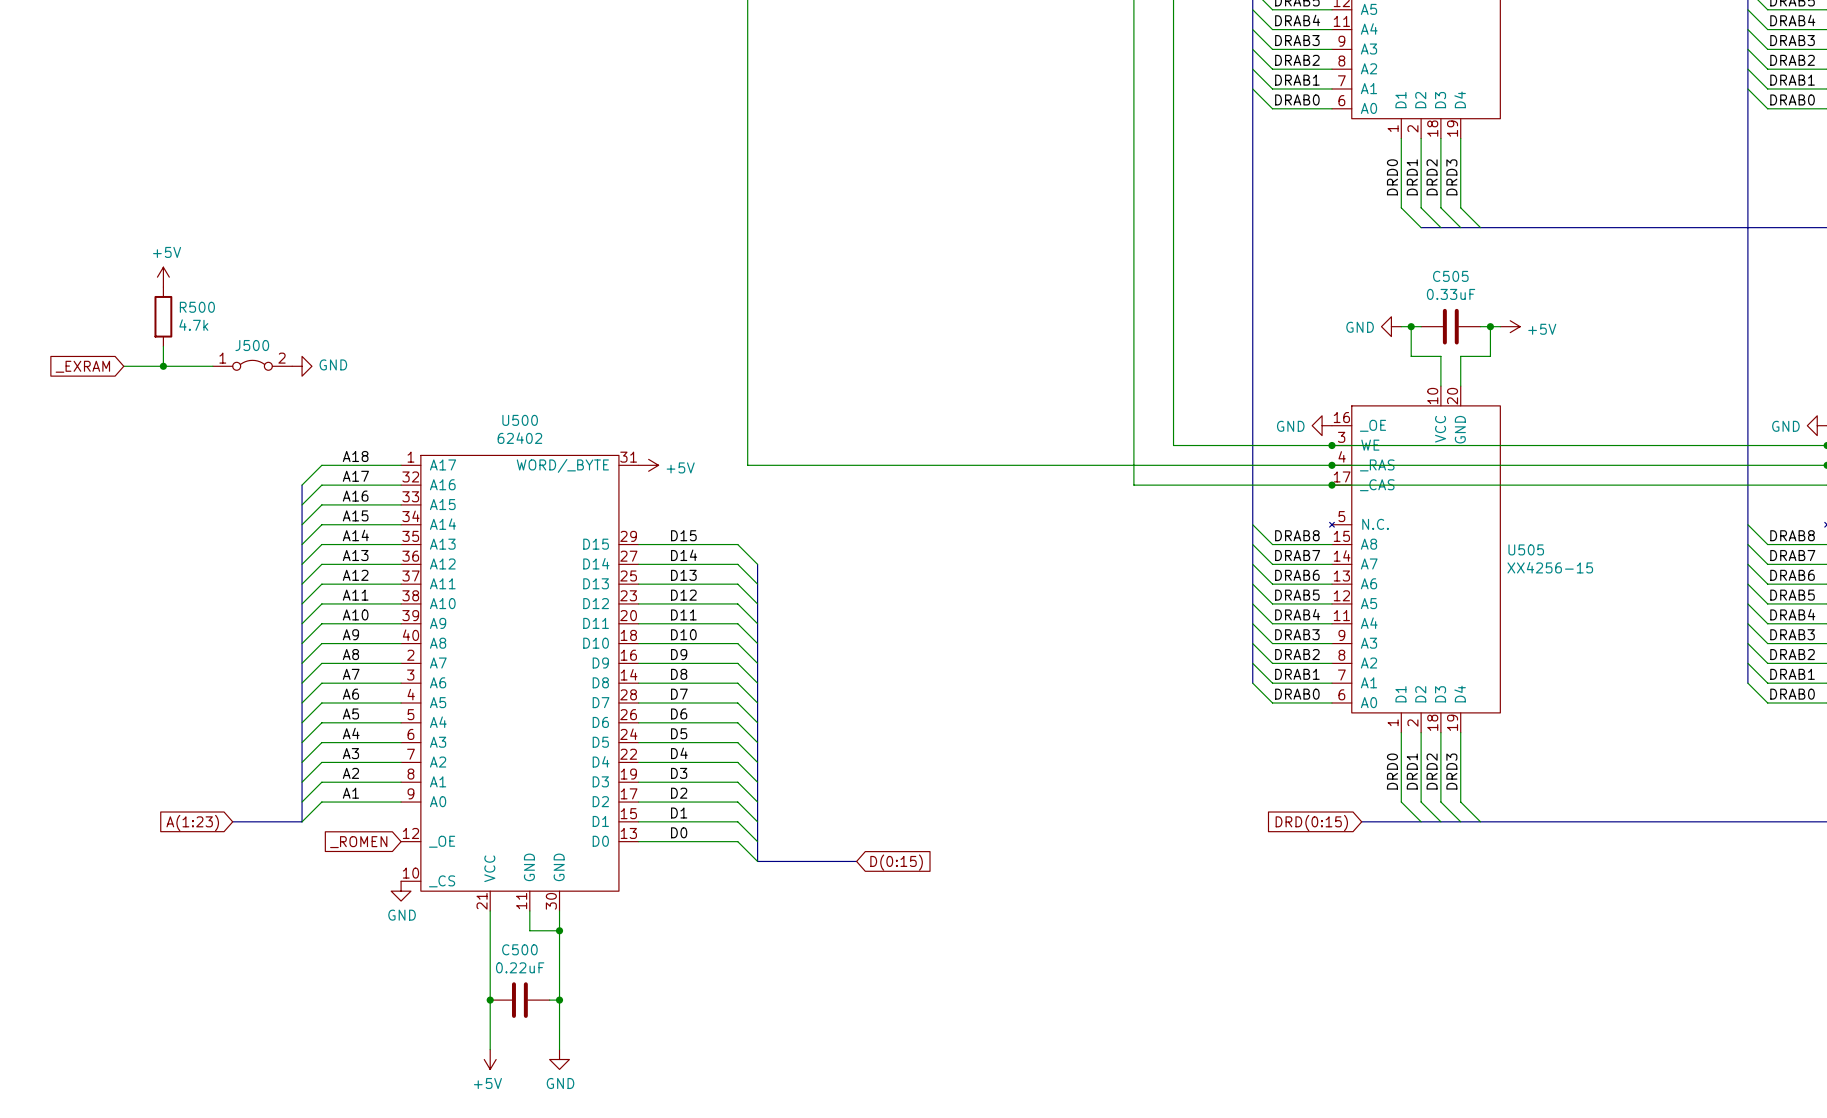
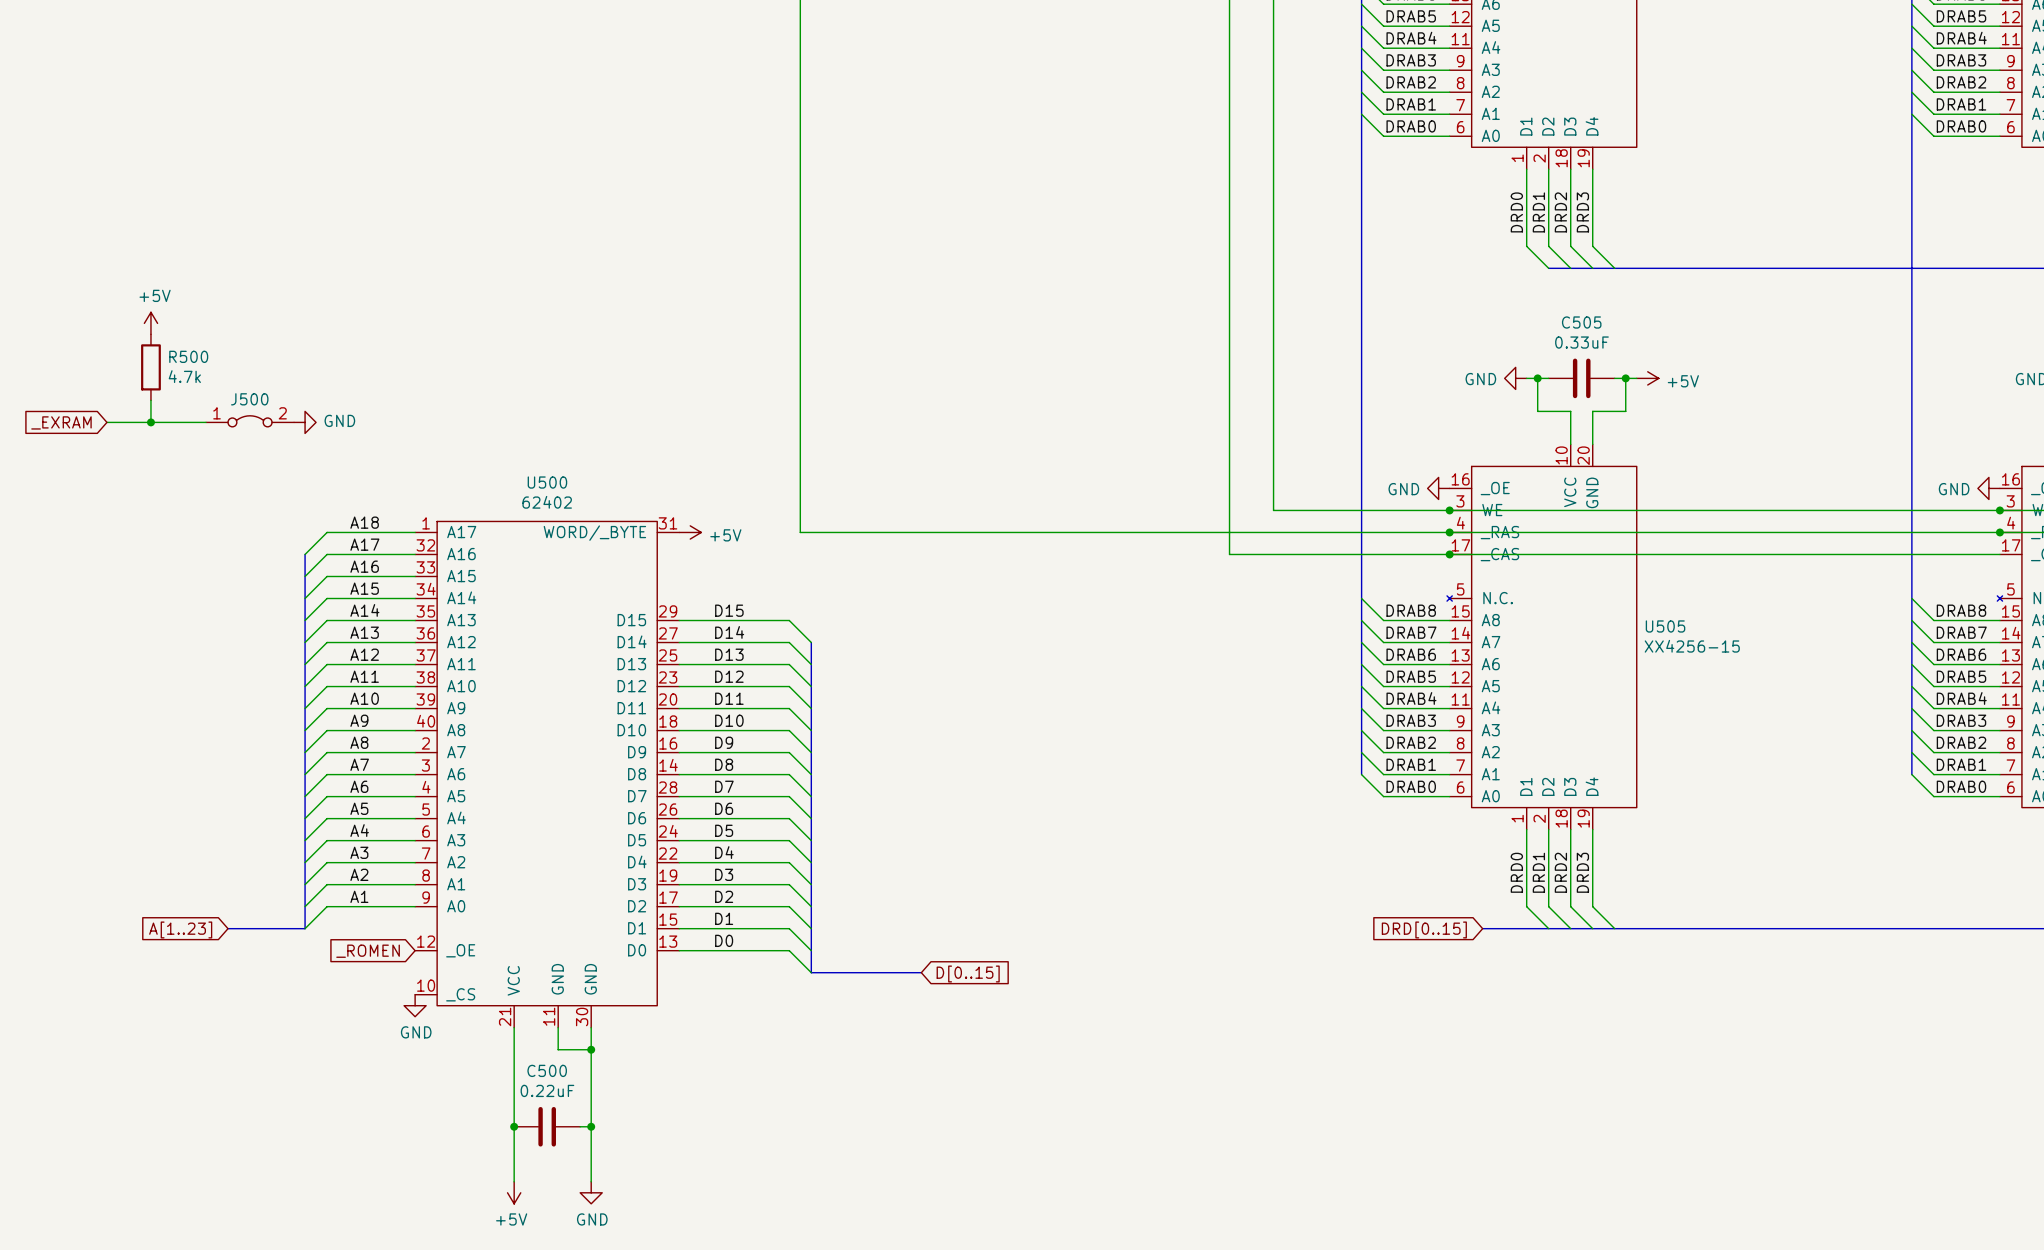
global label: A(1:23) (192, 823) -> A[1..23] (180, 929)
global label: DRD(0:15) (1311, 823) -> DRD[0..15] (1424, 929)
global label: D(0:15) (896, 862) -> D[0..15] (968, 974)

